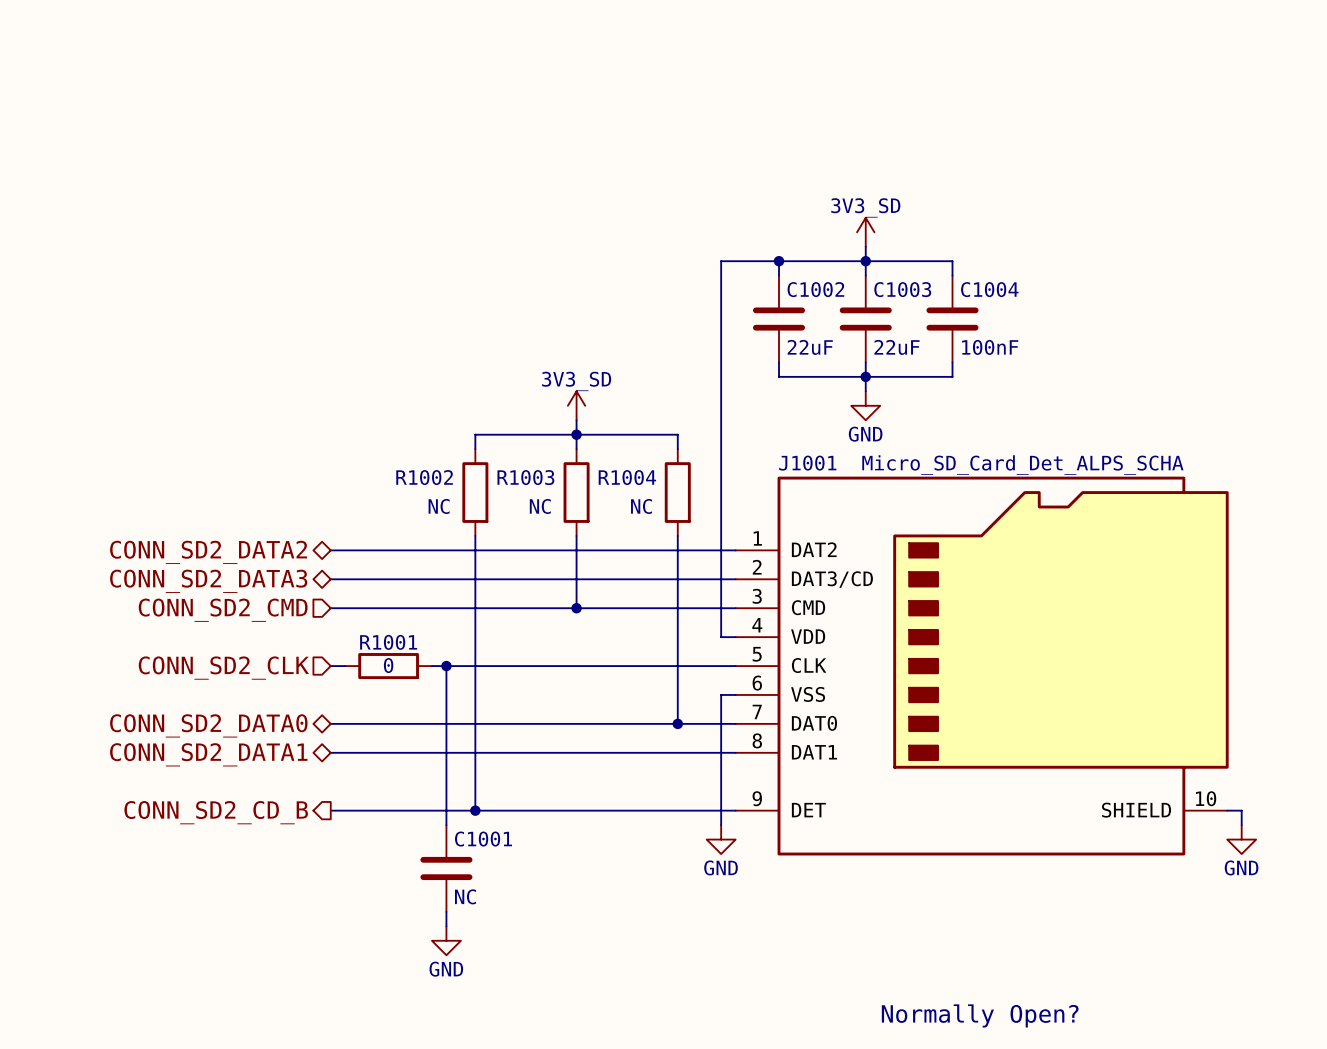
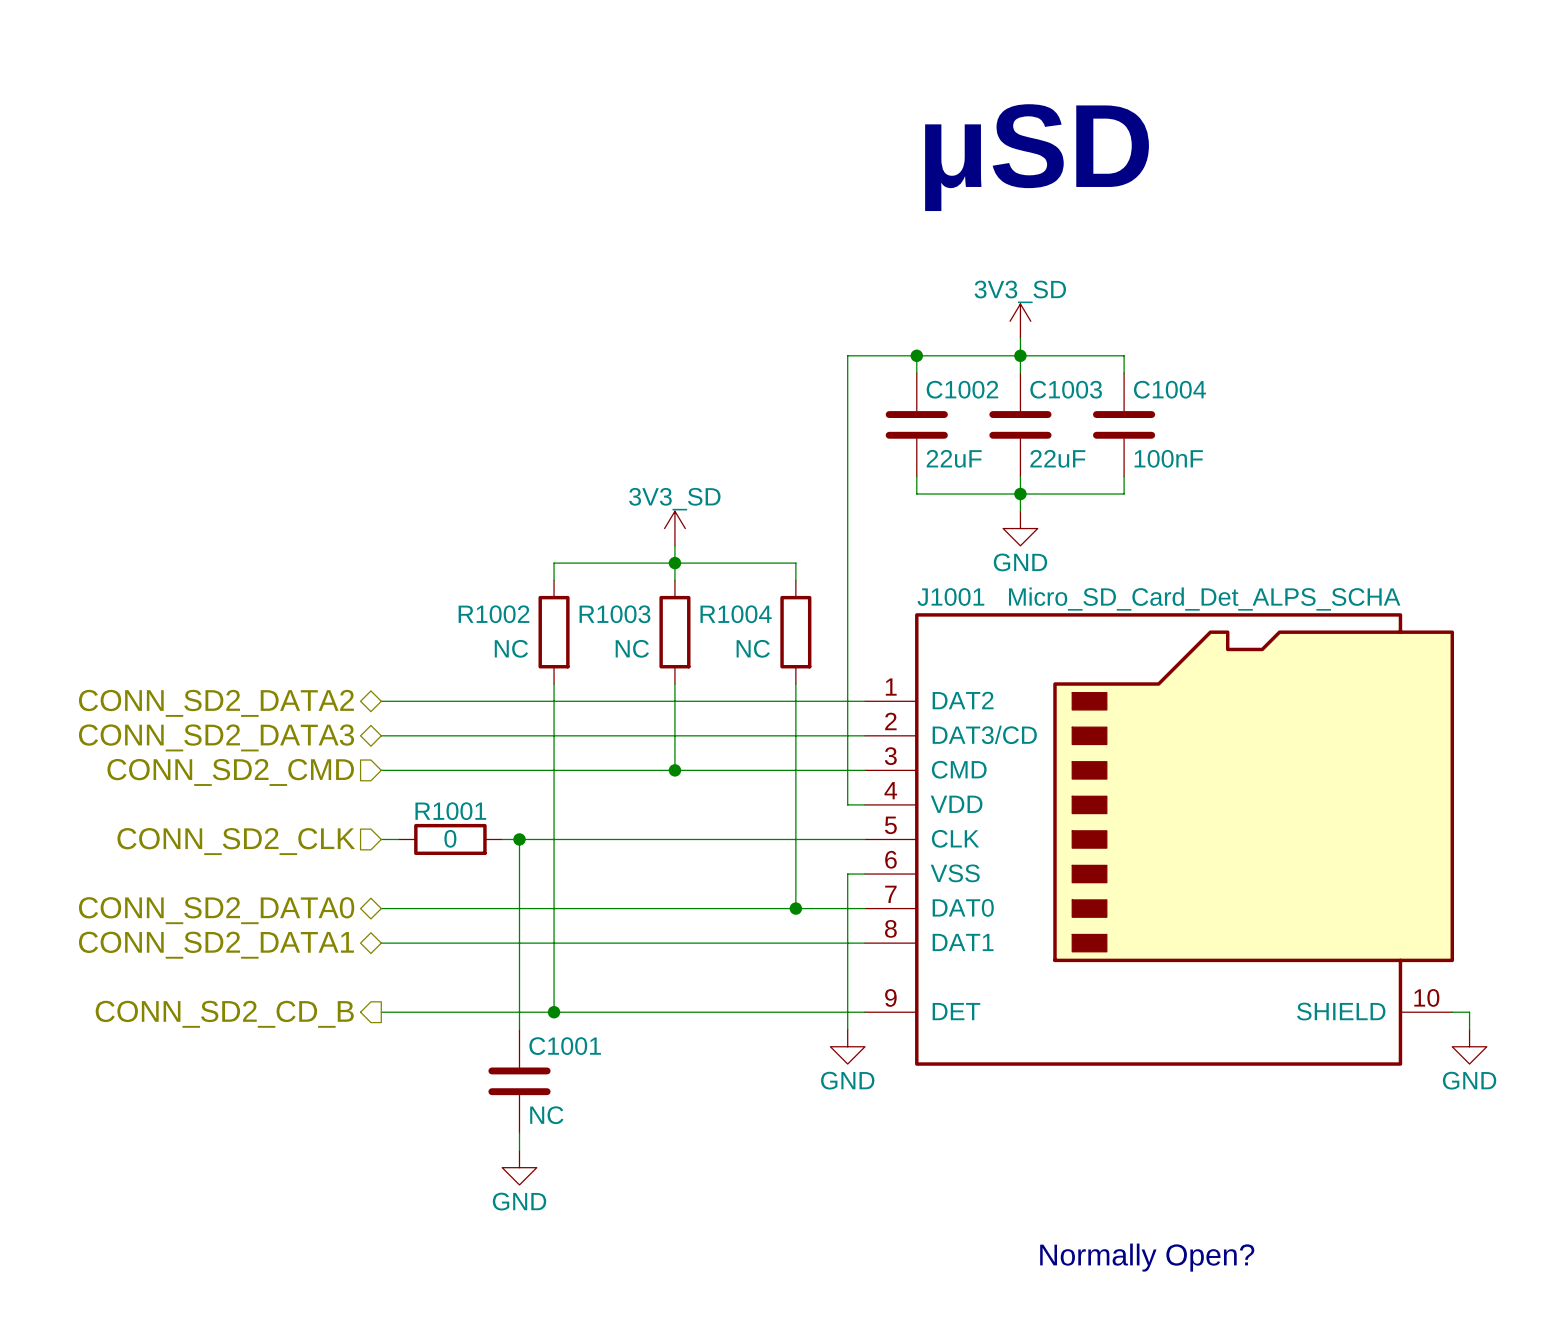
text: none -> μSD (1037, 157)

